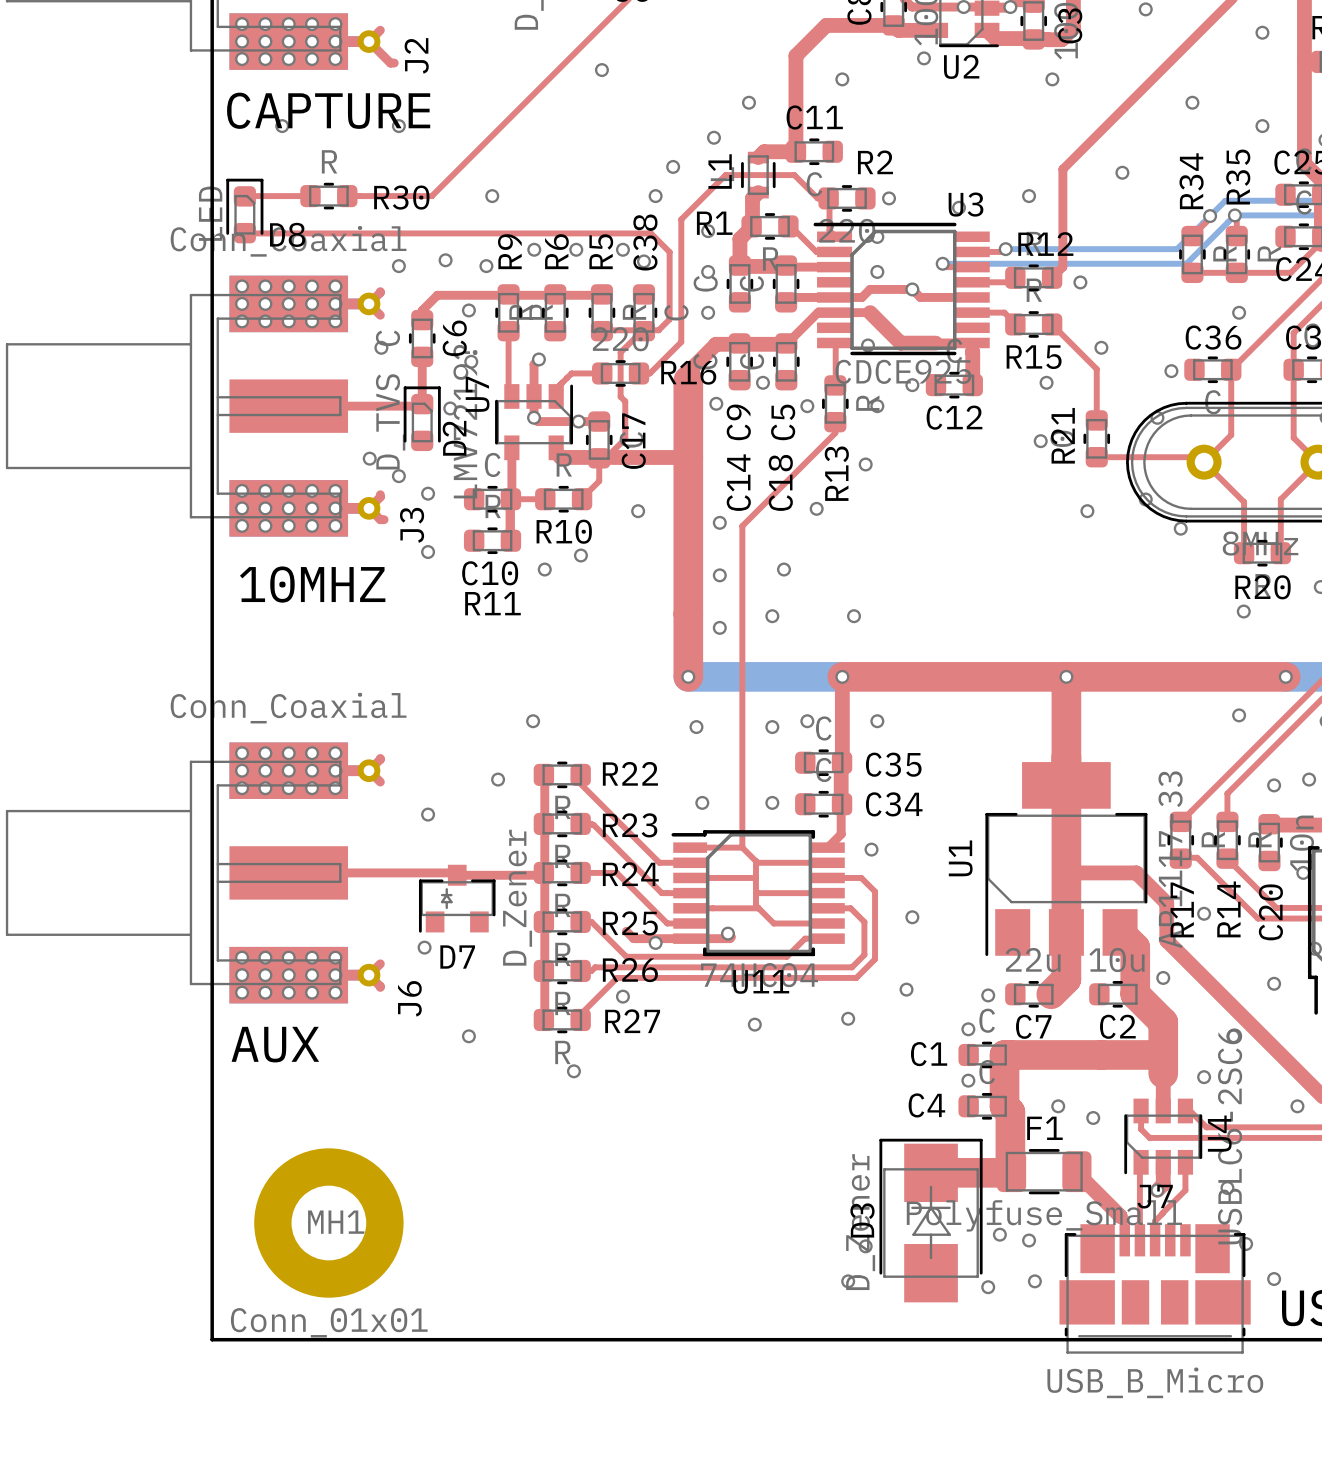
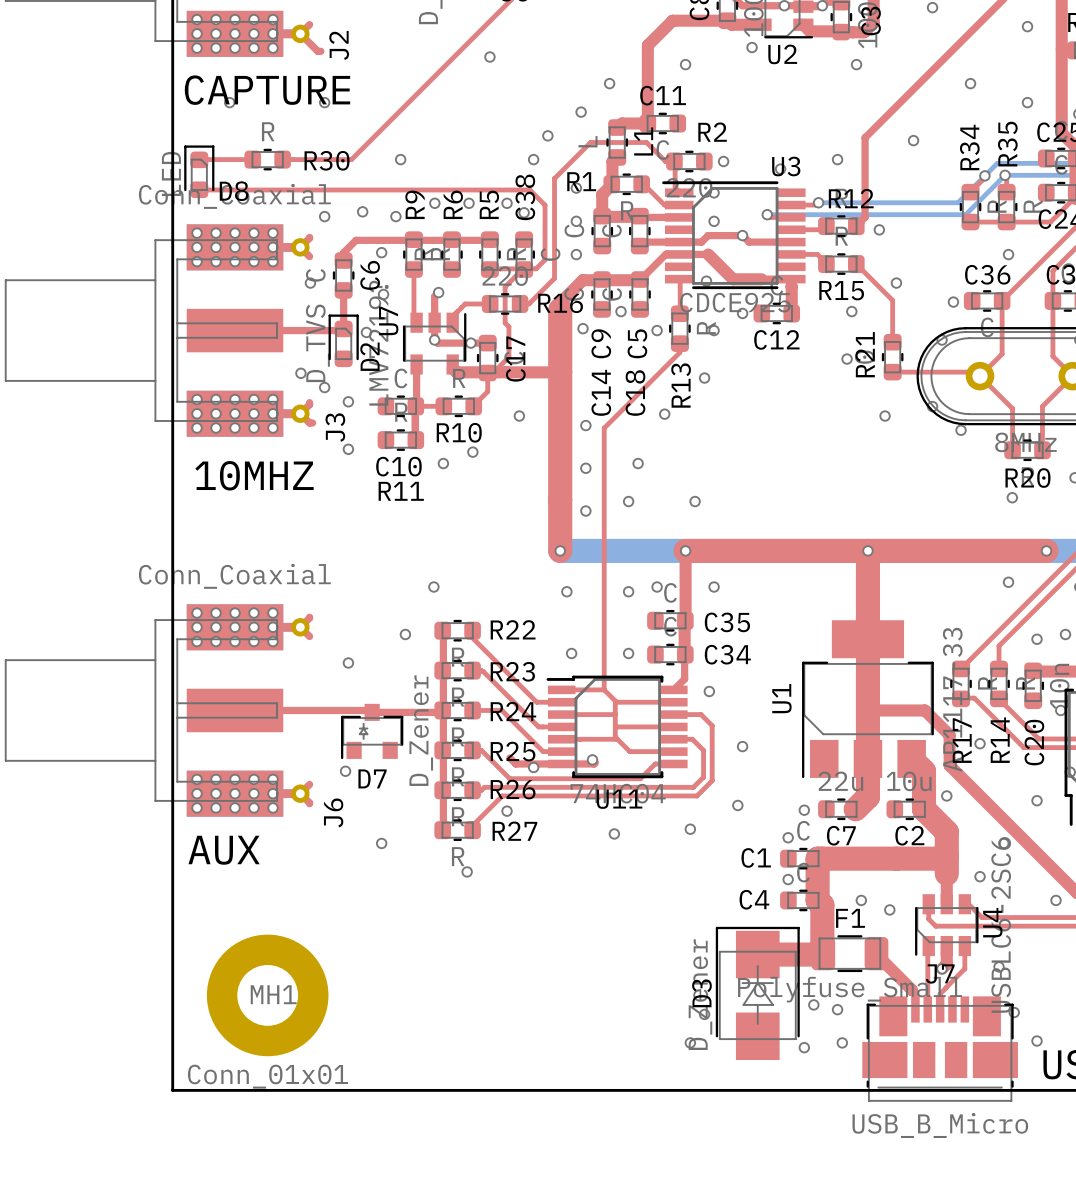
L1 footprint: [741, 151, 776, 199] -> [606, 119, 629, 166]
L1 name position: L1 (720, 171) -> L1 (643, 141)

